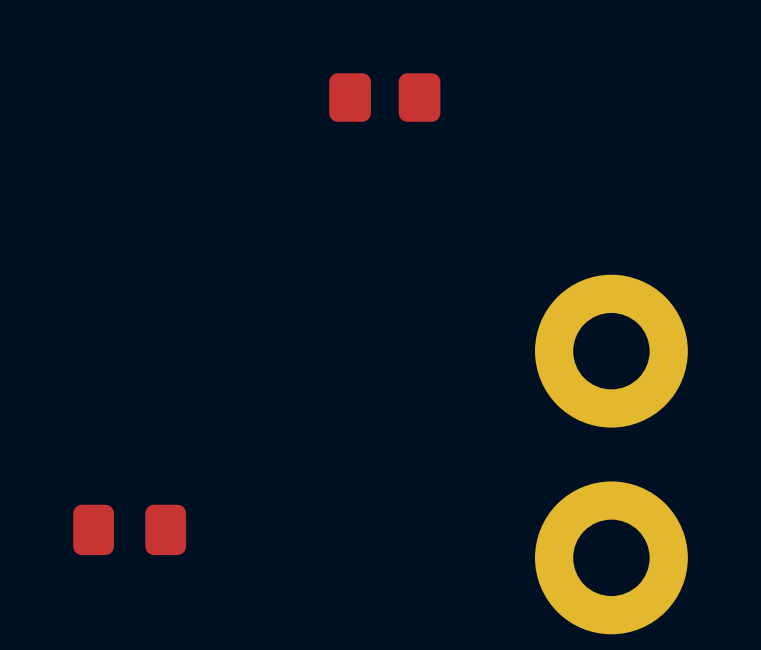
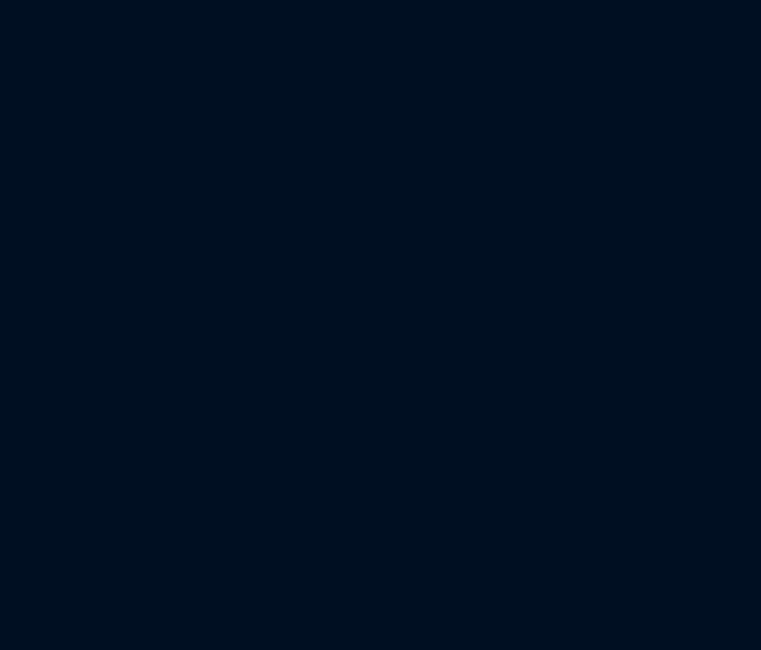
part: (384, 97) -> none
part: (611, 351) -> none
part: (129, 529) -> none
part: (611, 557) -> none

